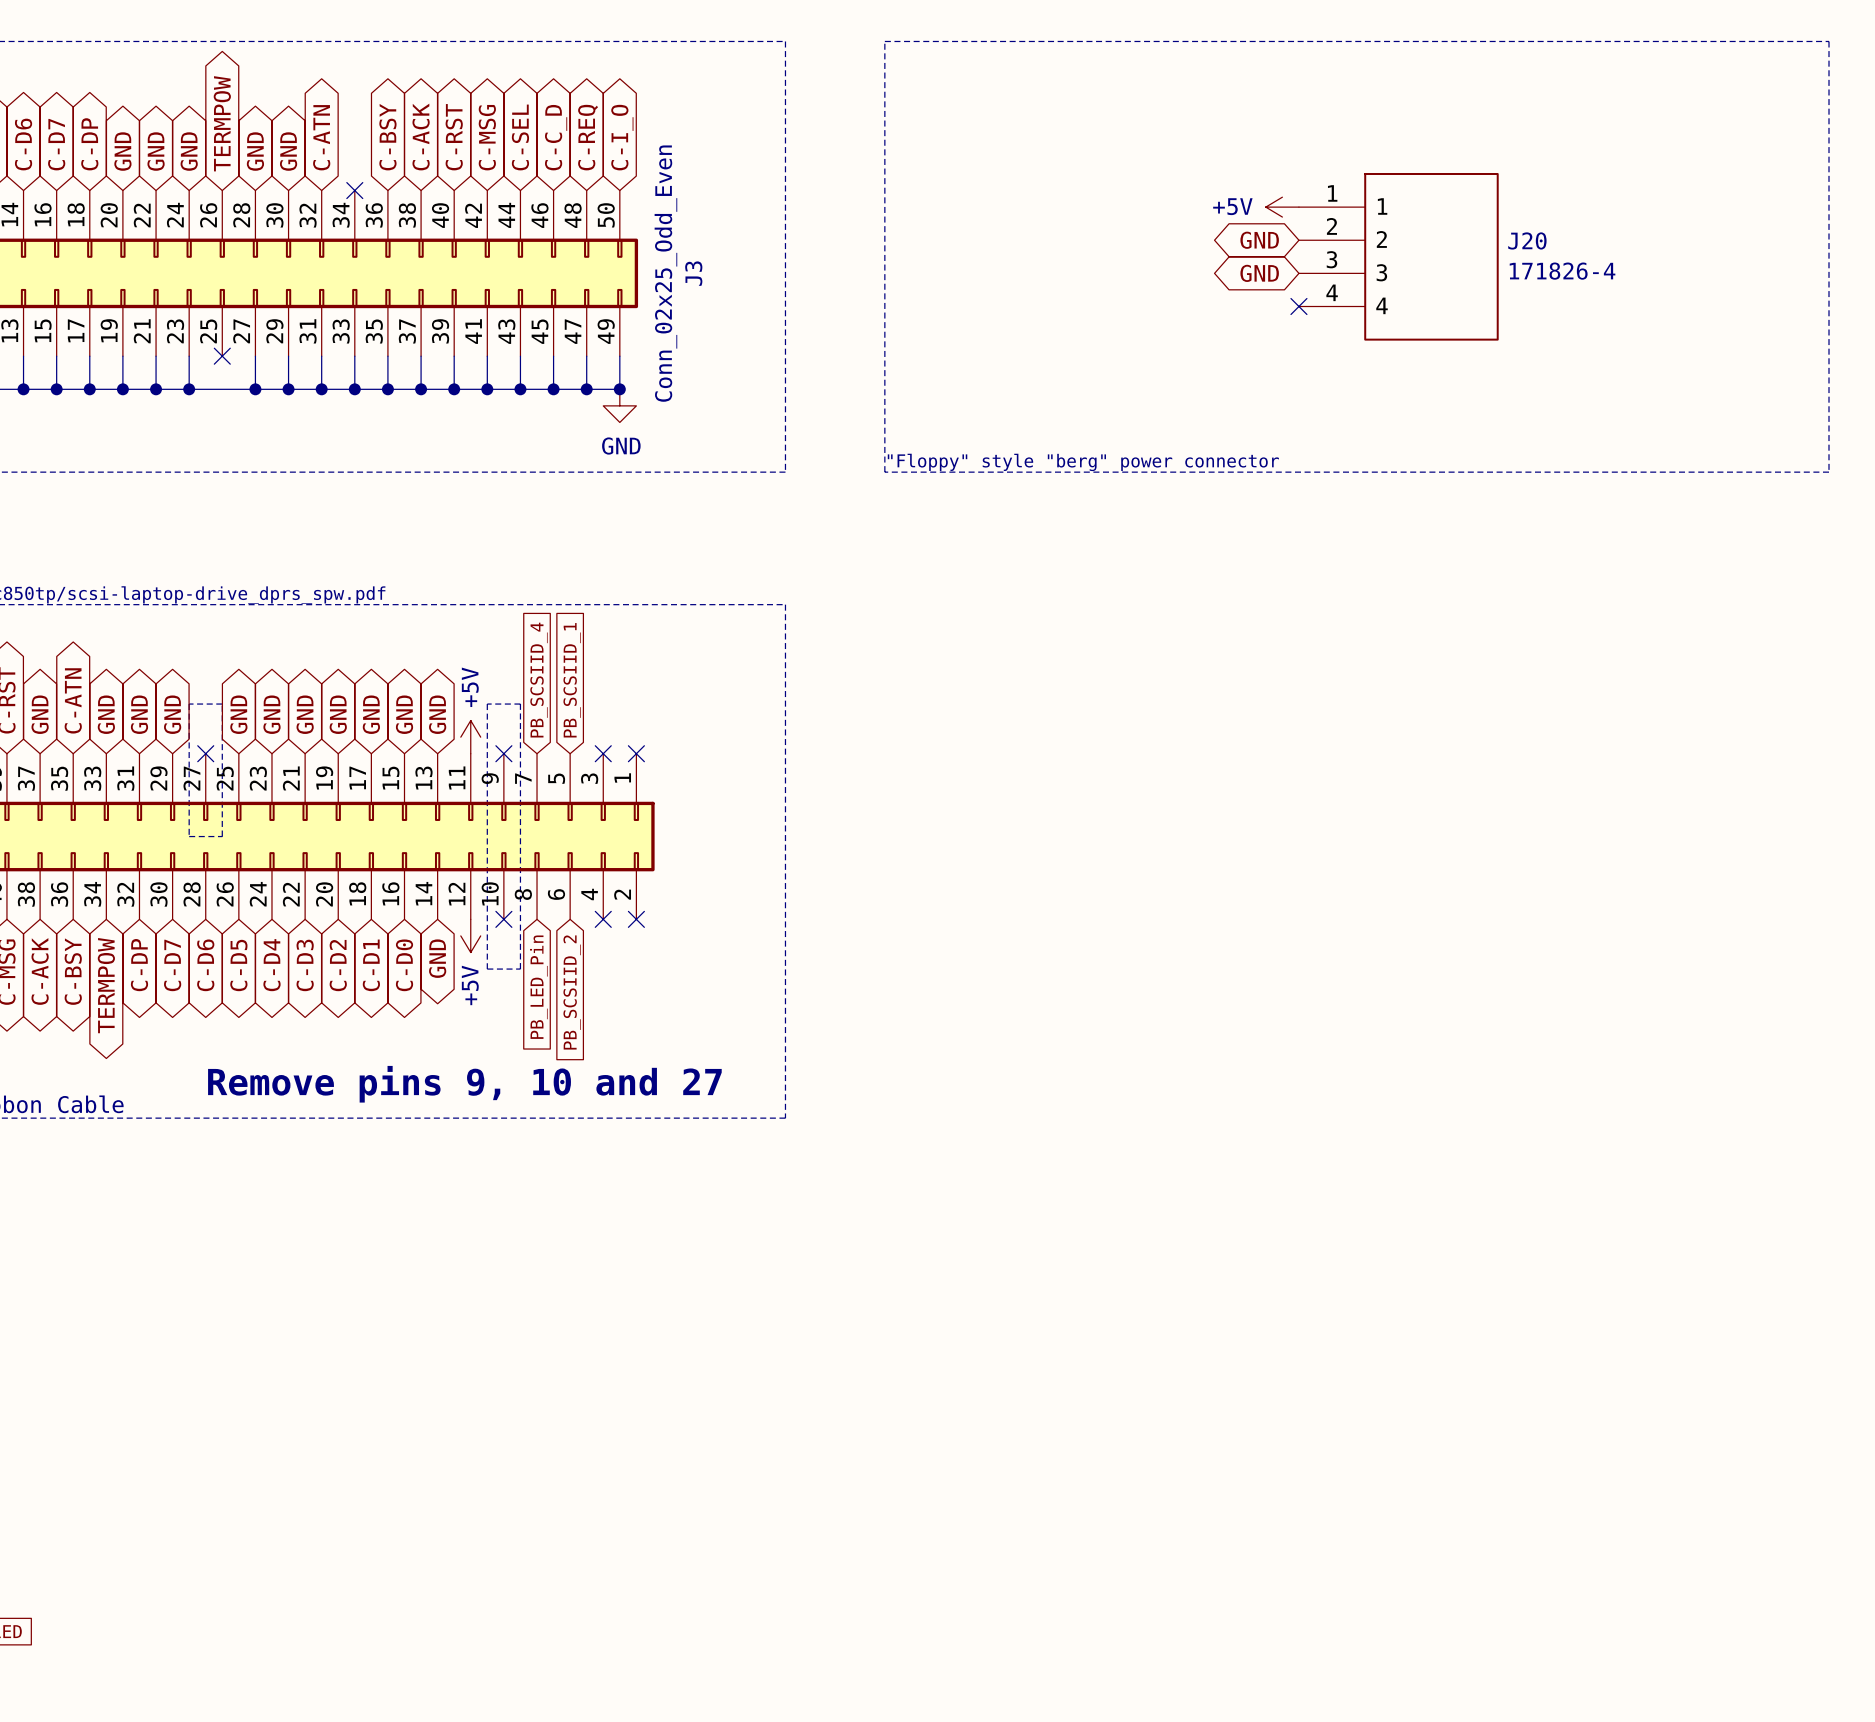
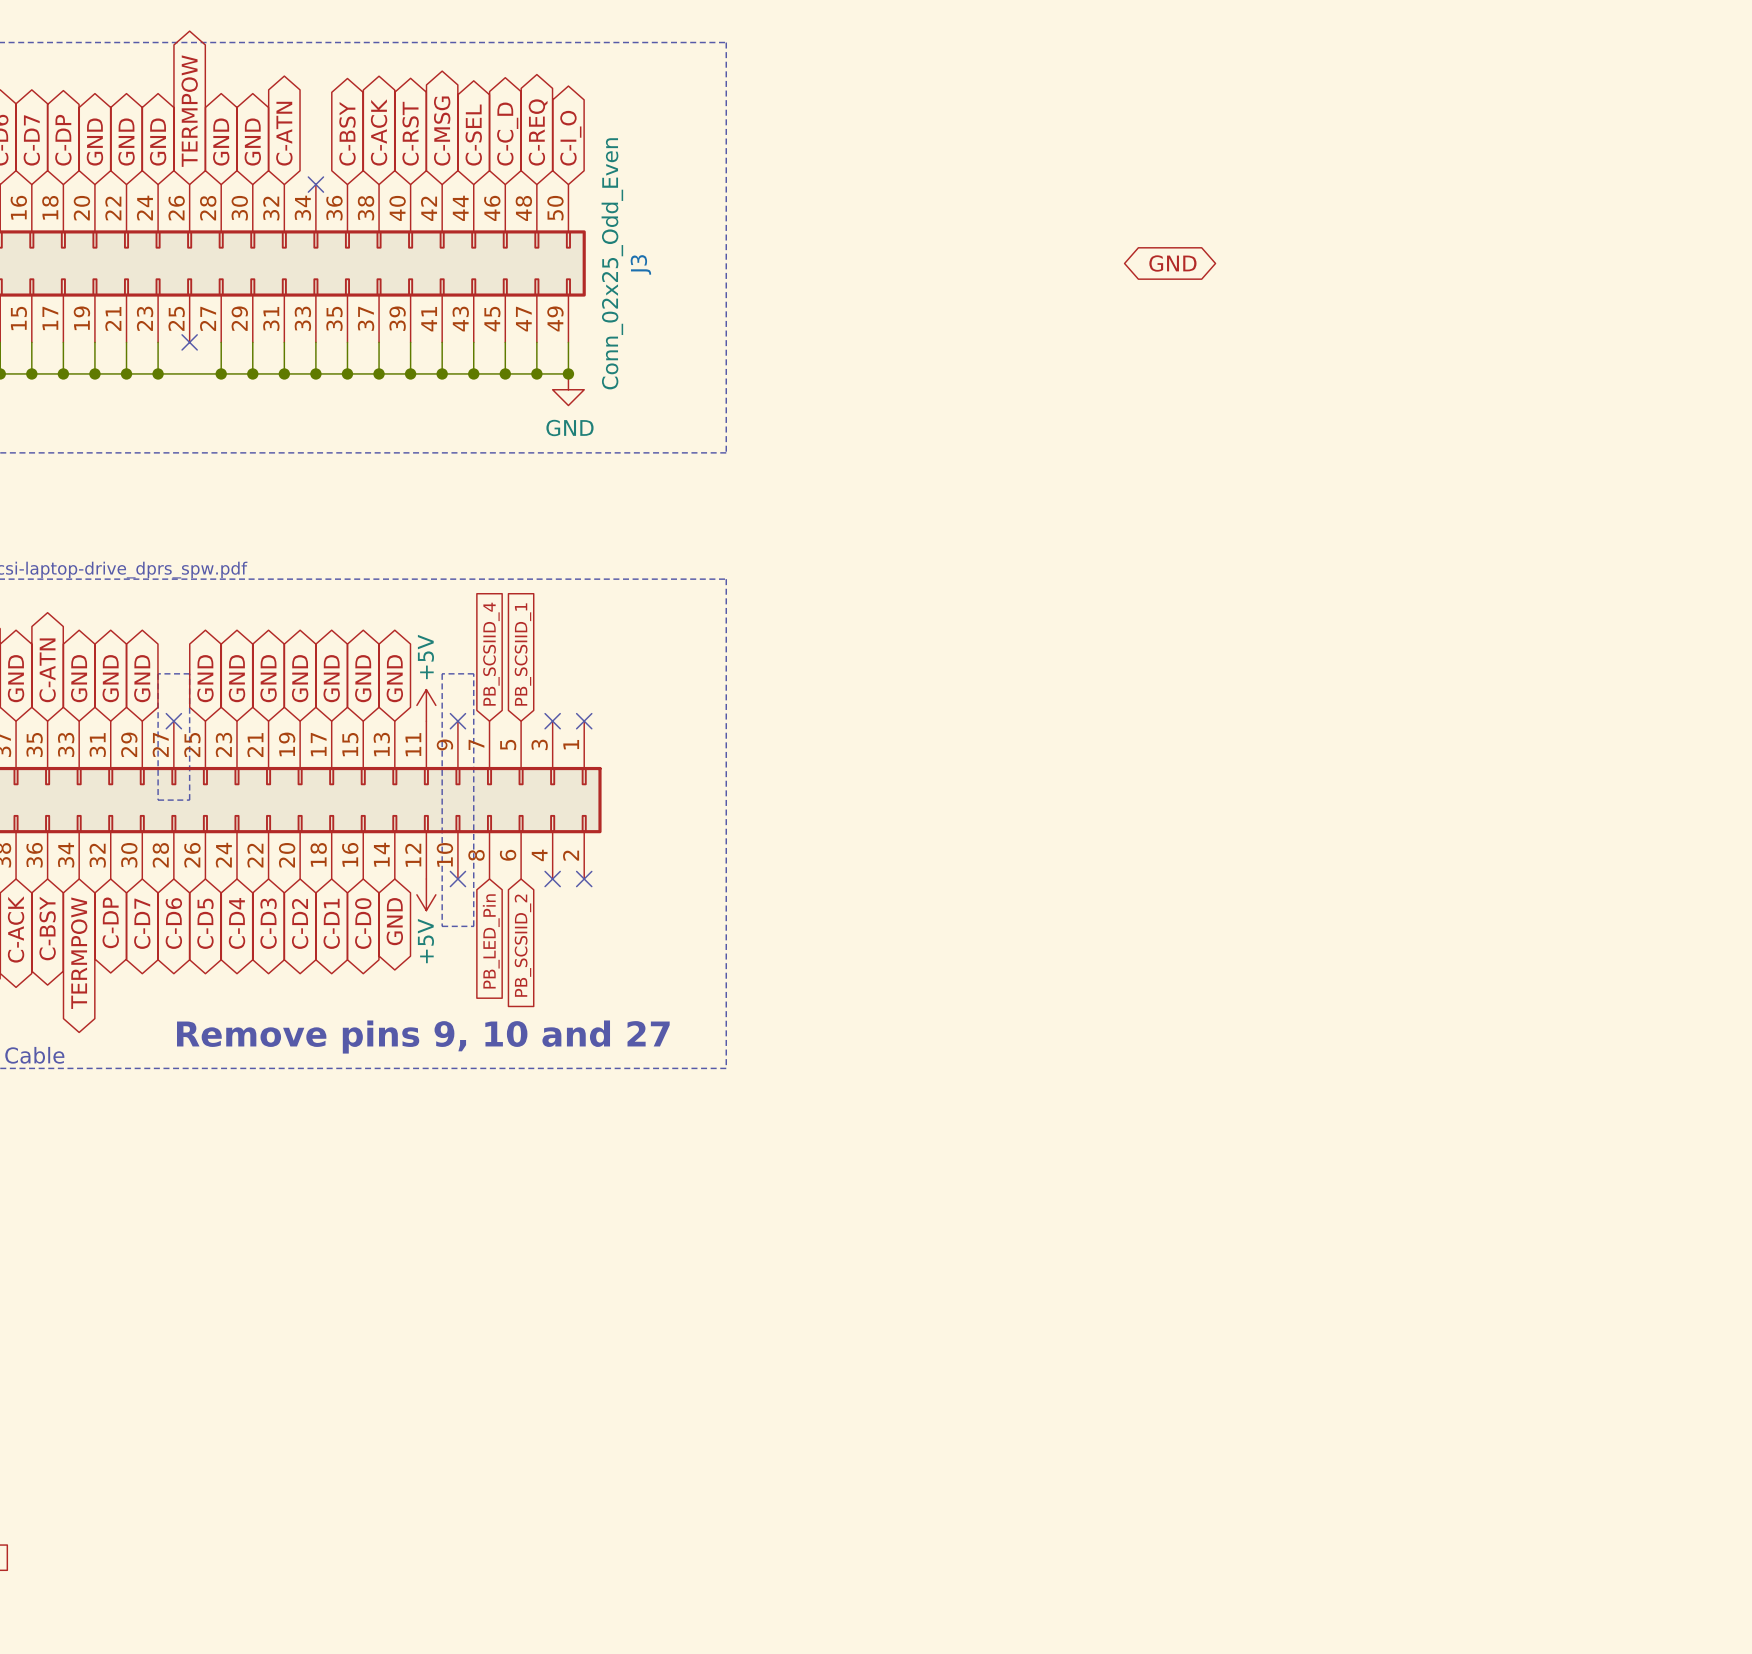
line: (884, 41) (1829, 41) (1829, 472) (884, 472) (884, 41) -> none
power symbol: +5V (1282, 207) -> none
global label: GND (1259, 240) -> none
J20: 171826-4 (1398, 256) -> none
no-connect mark: (1298, 306) -> none
text: "Floppy" style "berg" power connector (1083, 462) -> none

